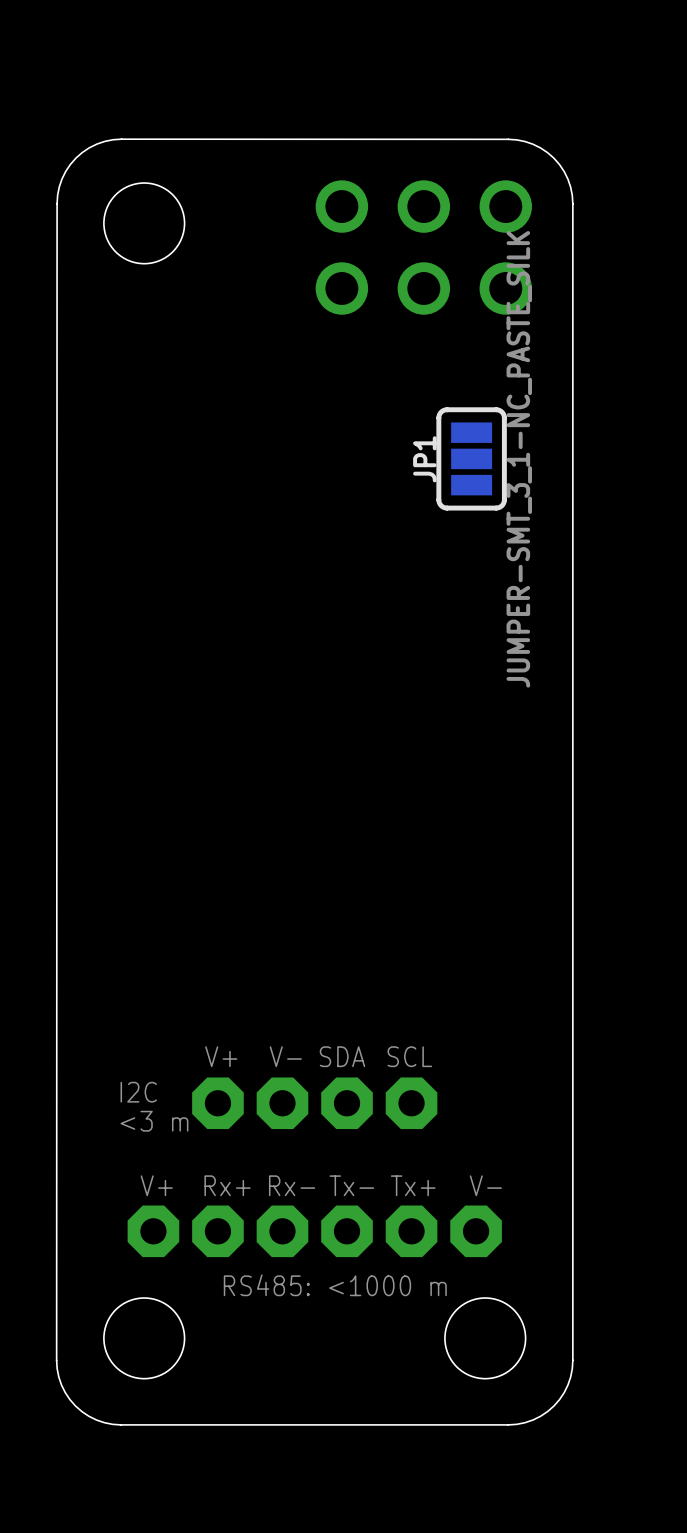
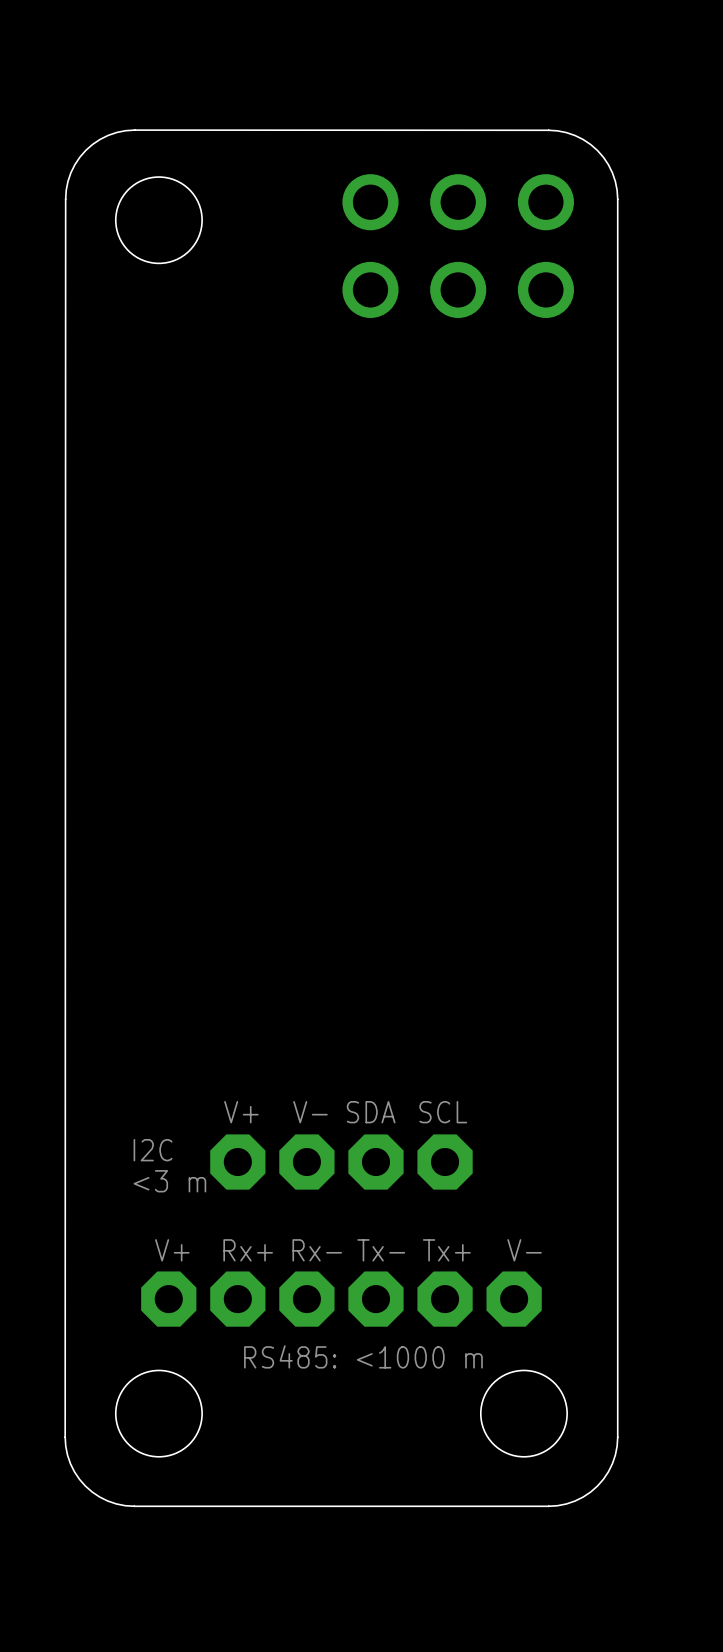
JP1: JUMPER-SMT_3_1-NC_PASTE_SILK (471, 458) -> none

